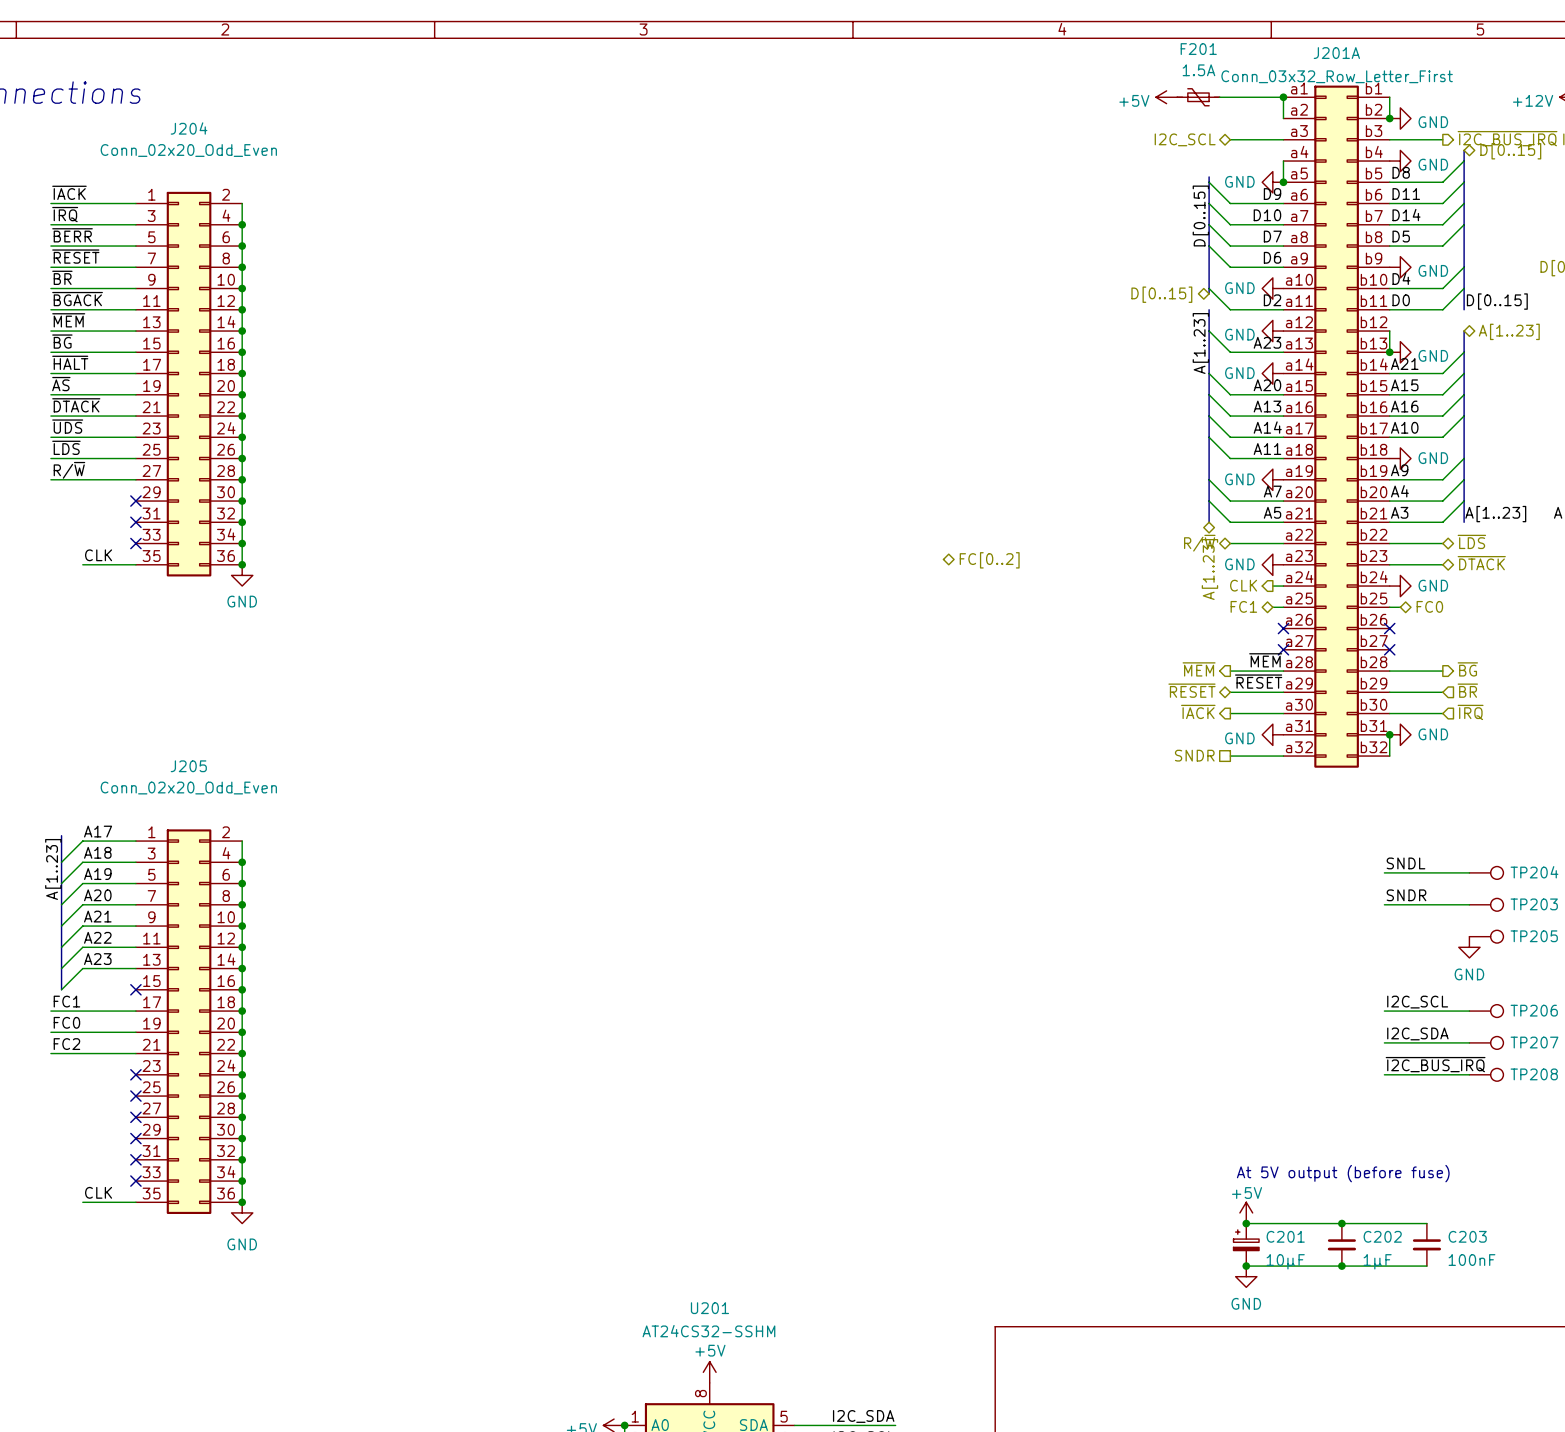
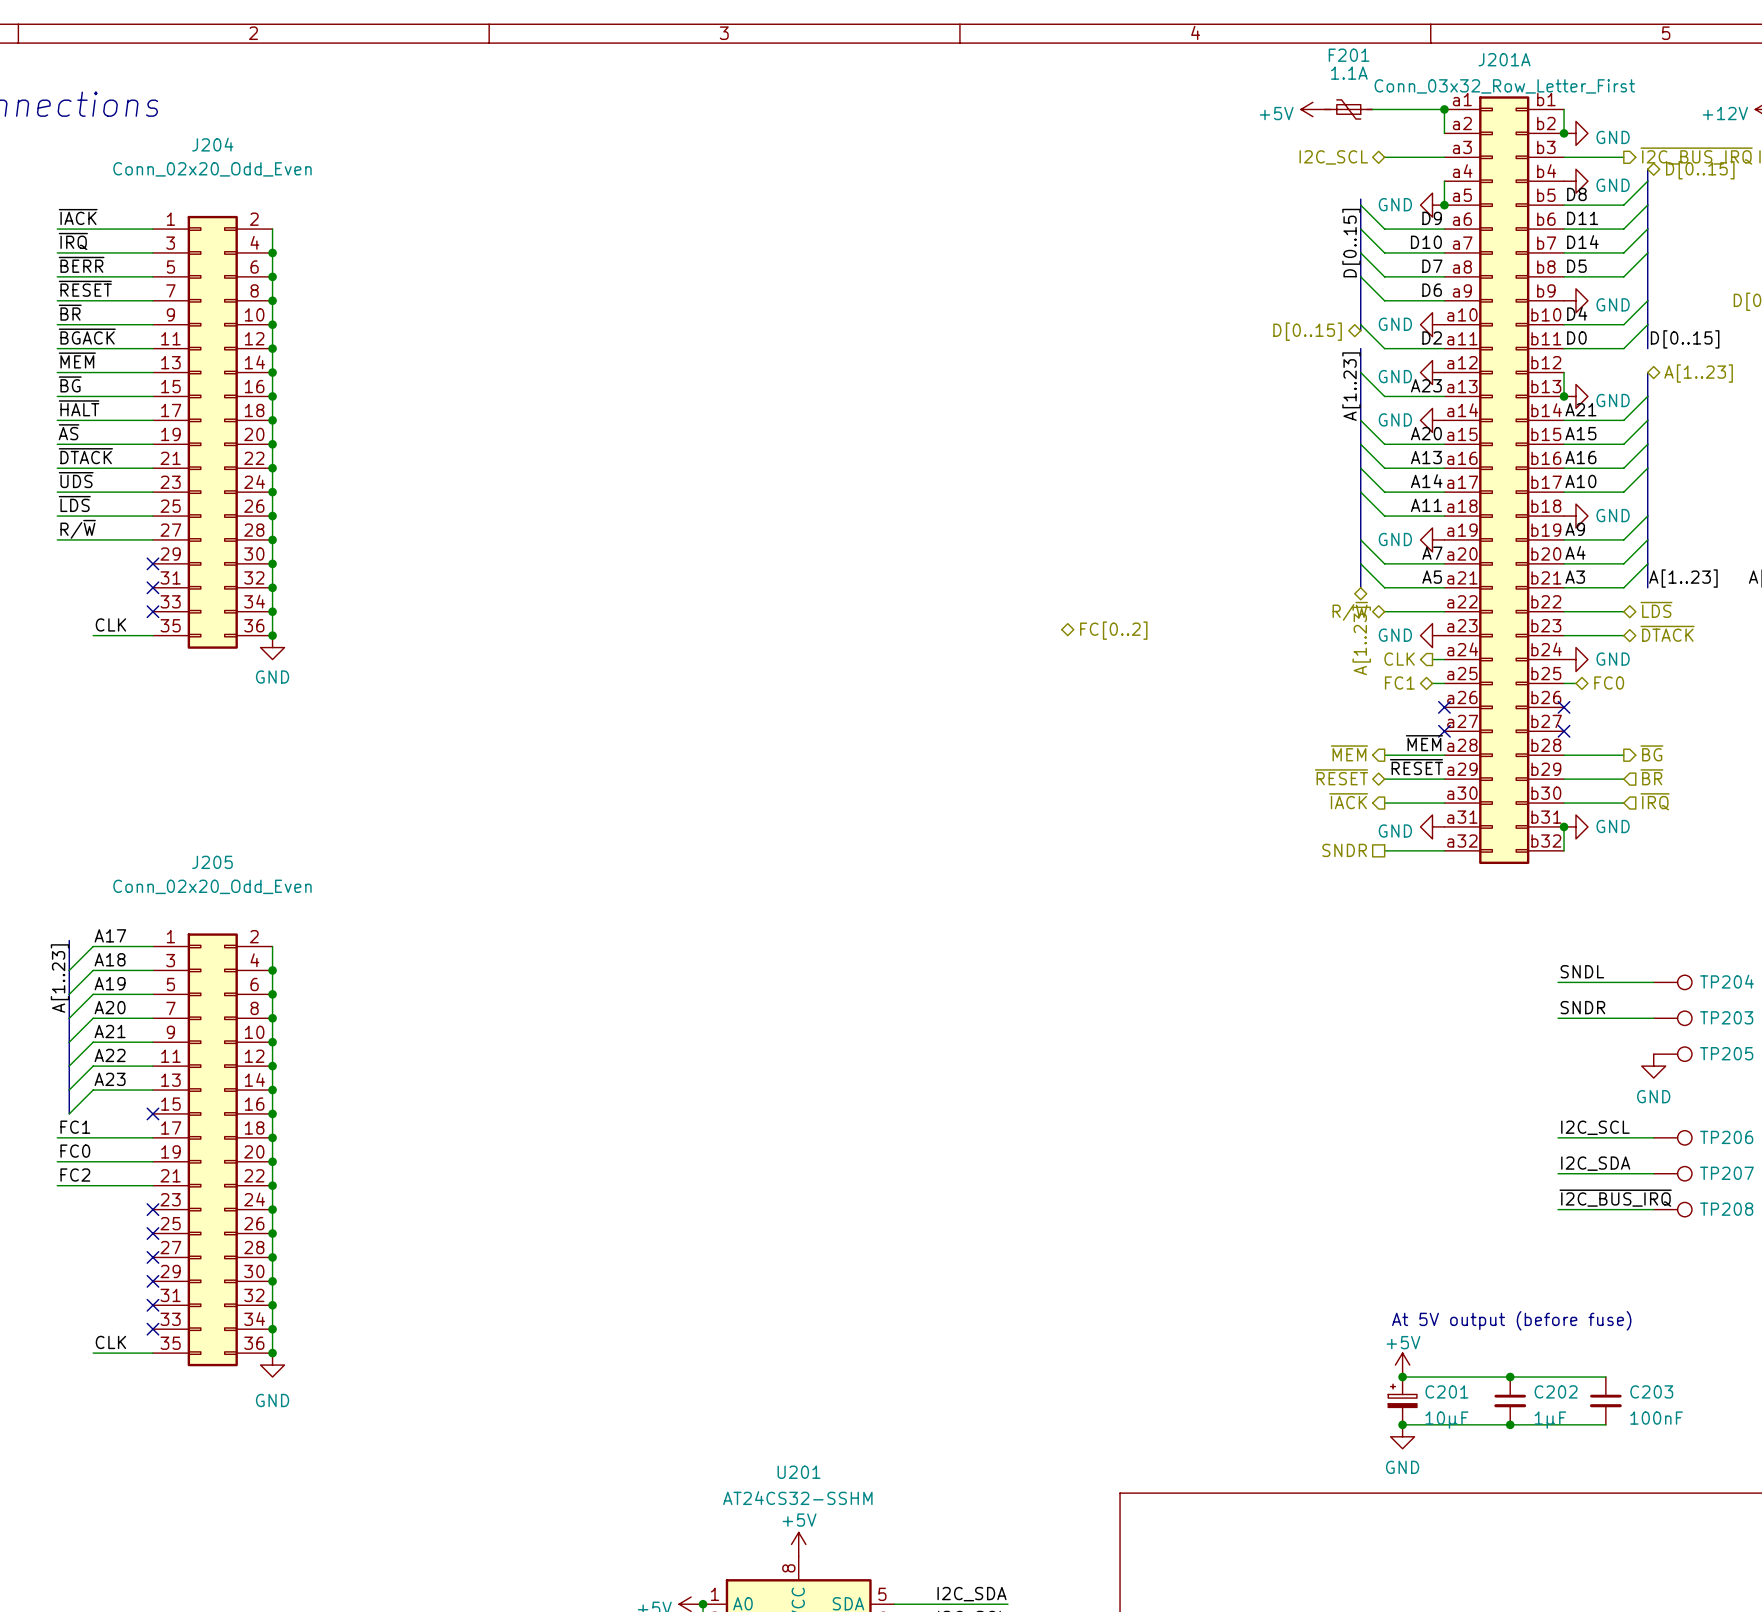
F201 value: 1.5A (1198, 70) -> 1.1A (1349, 73)

